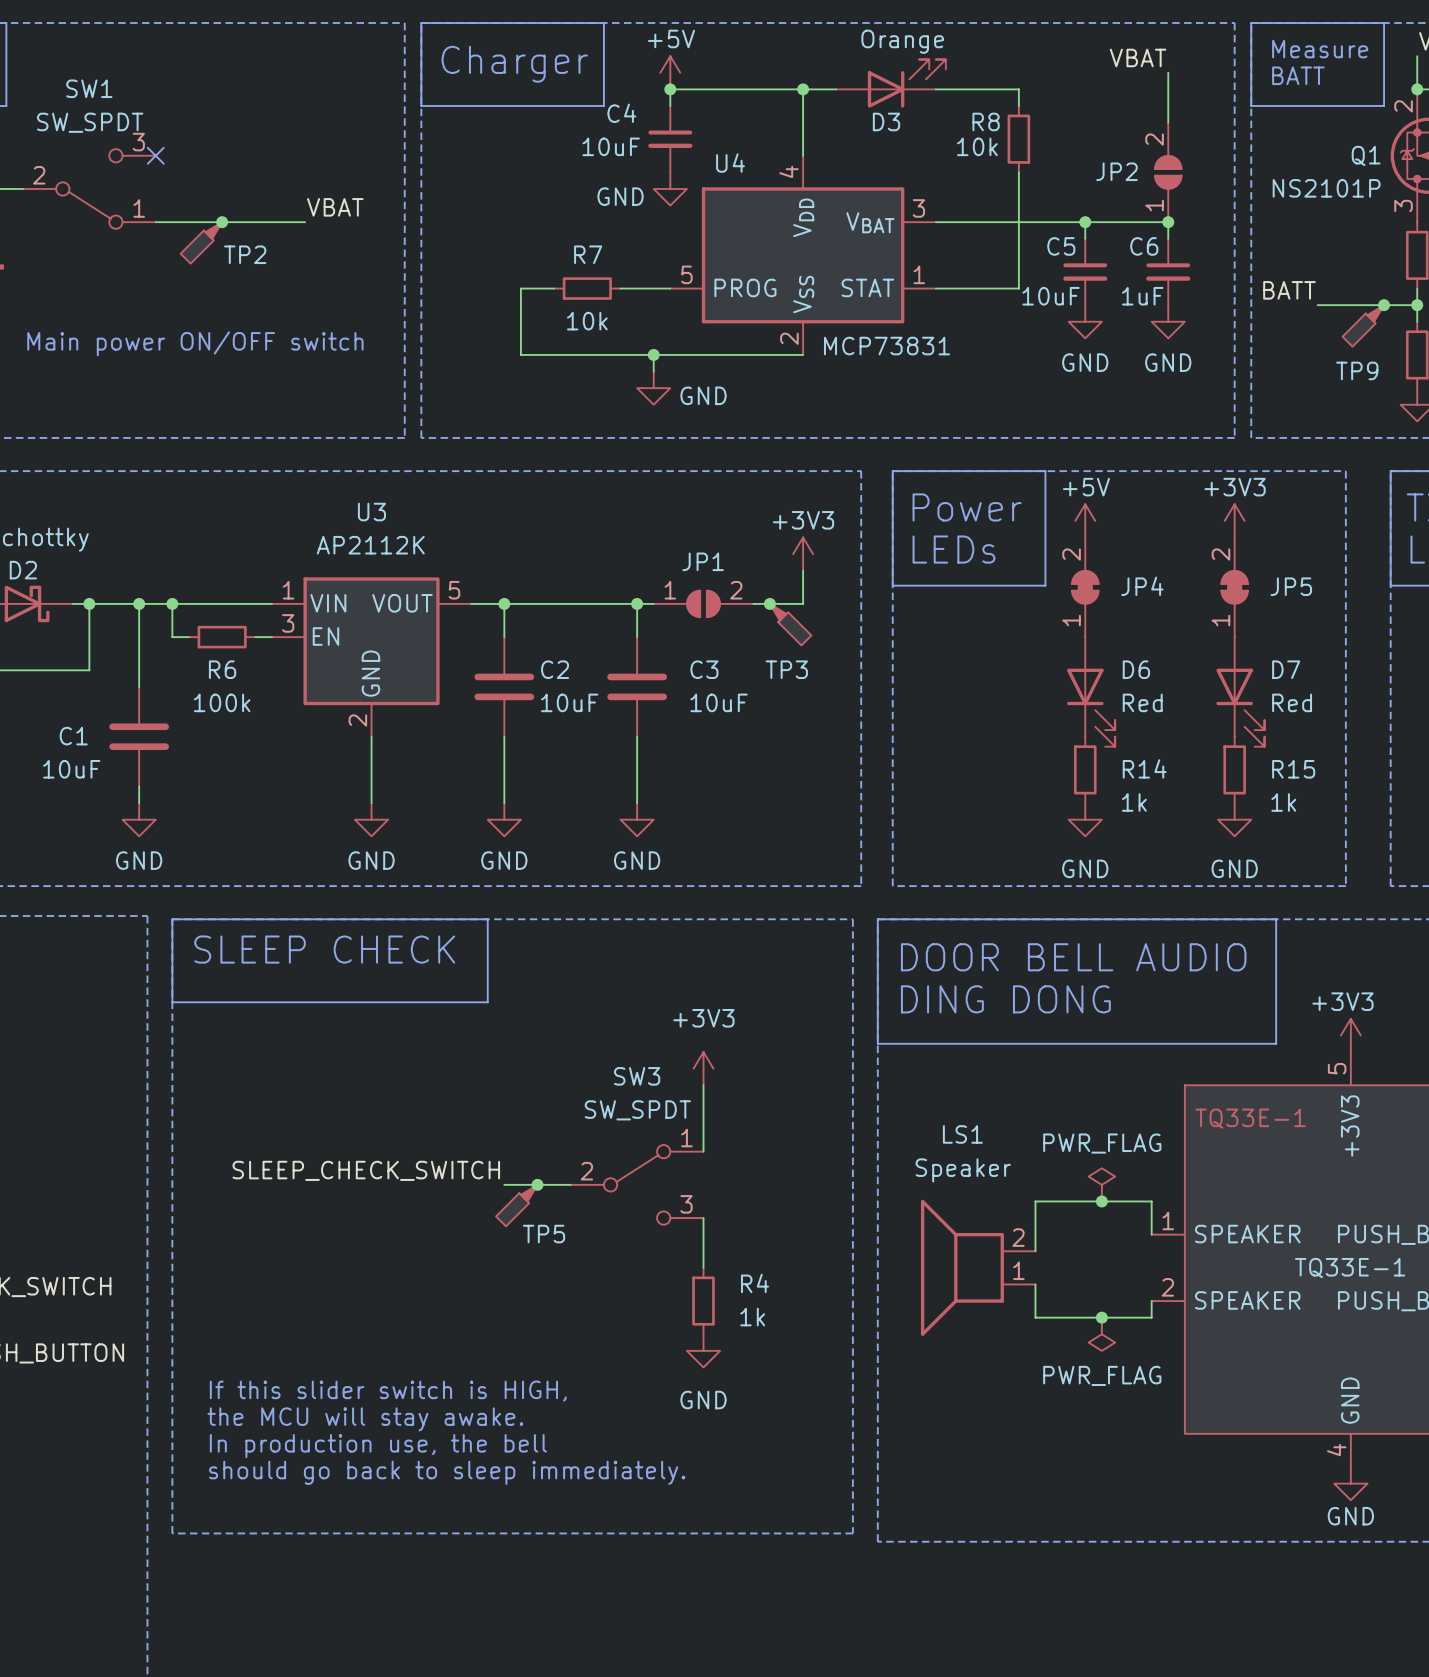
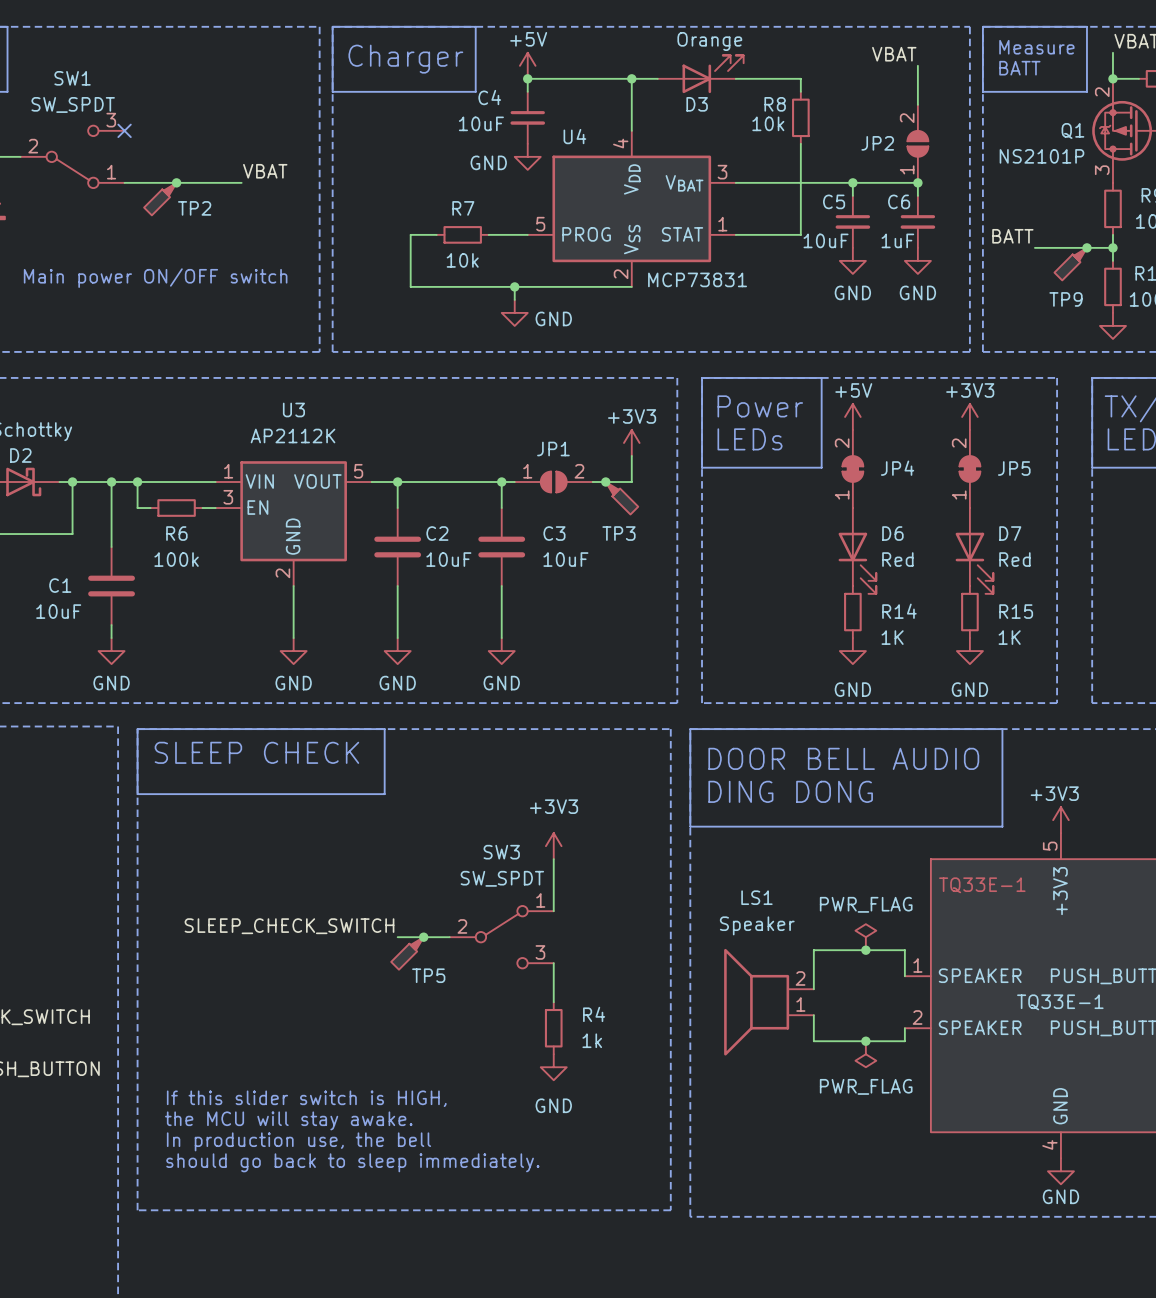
R14 value: 1k (1134, 802) -> 1K (892, 637)
R15 value: 1k (1283, 802) -> 1K (1009, 637)

